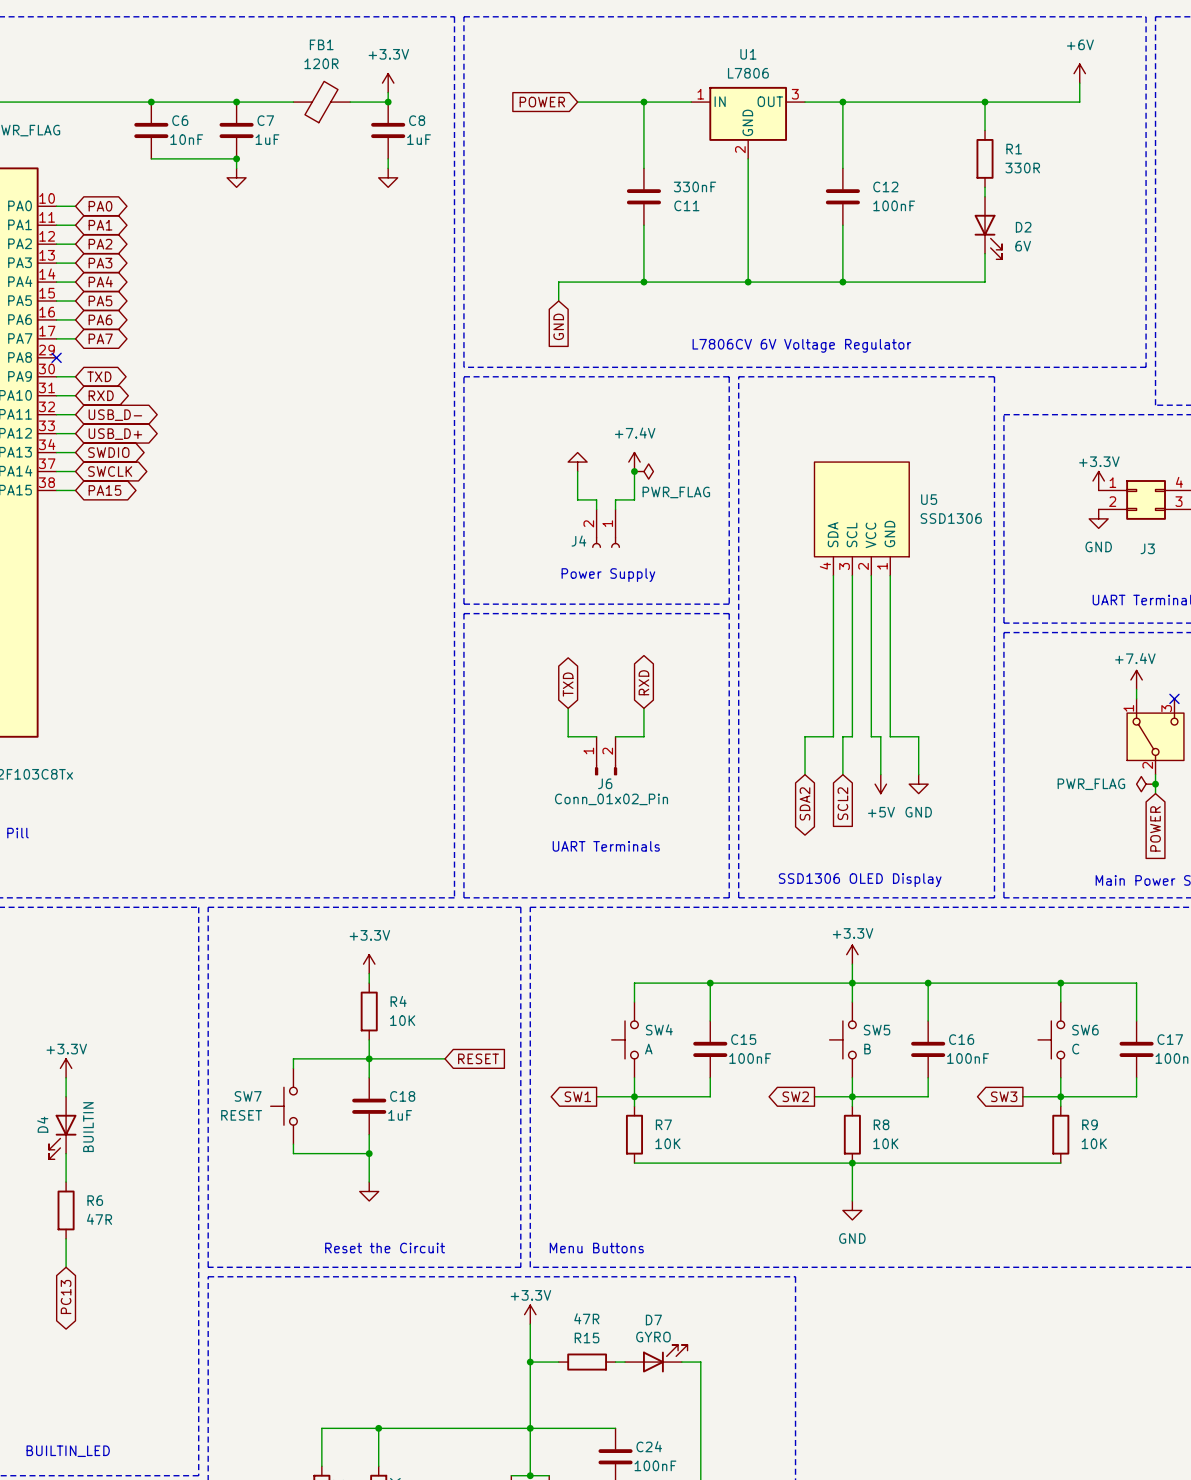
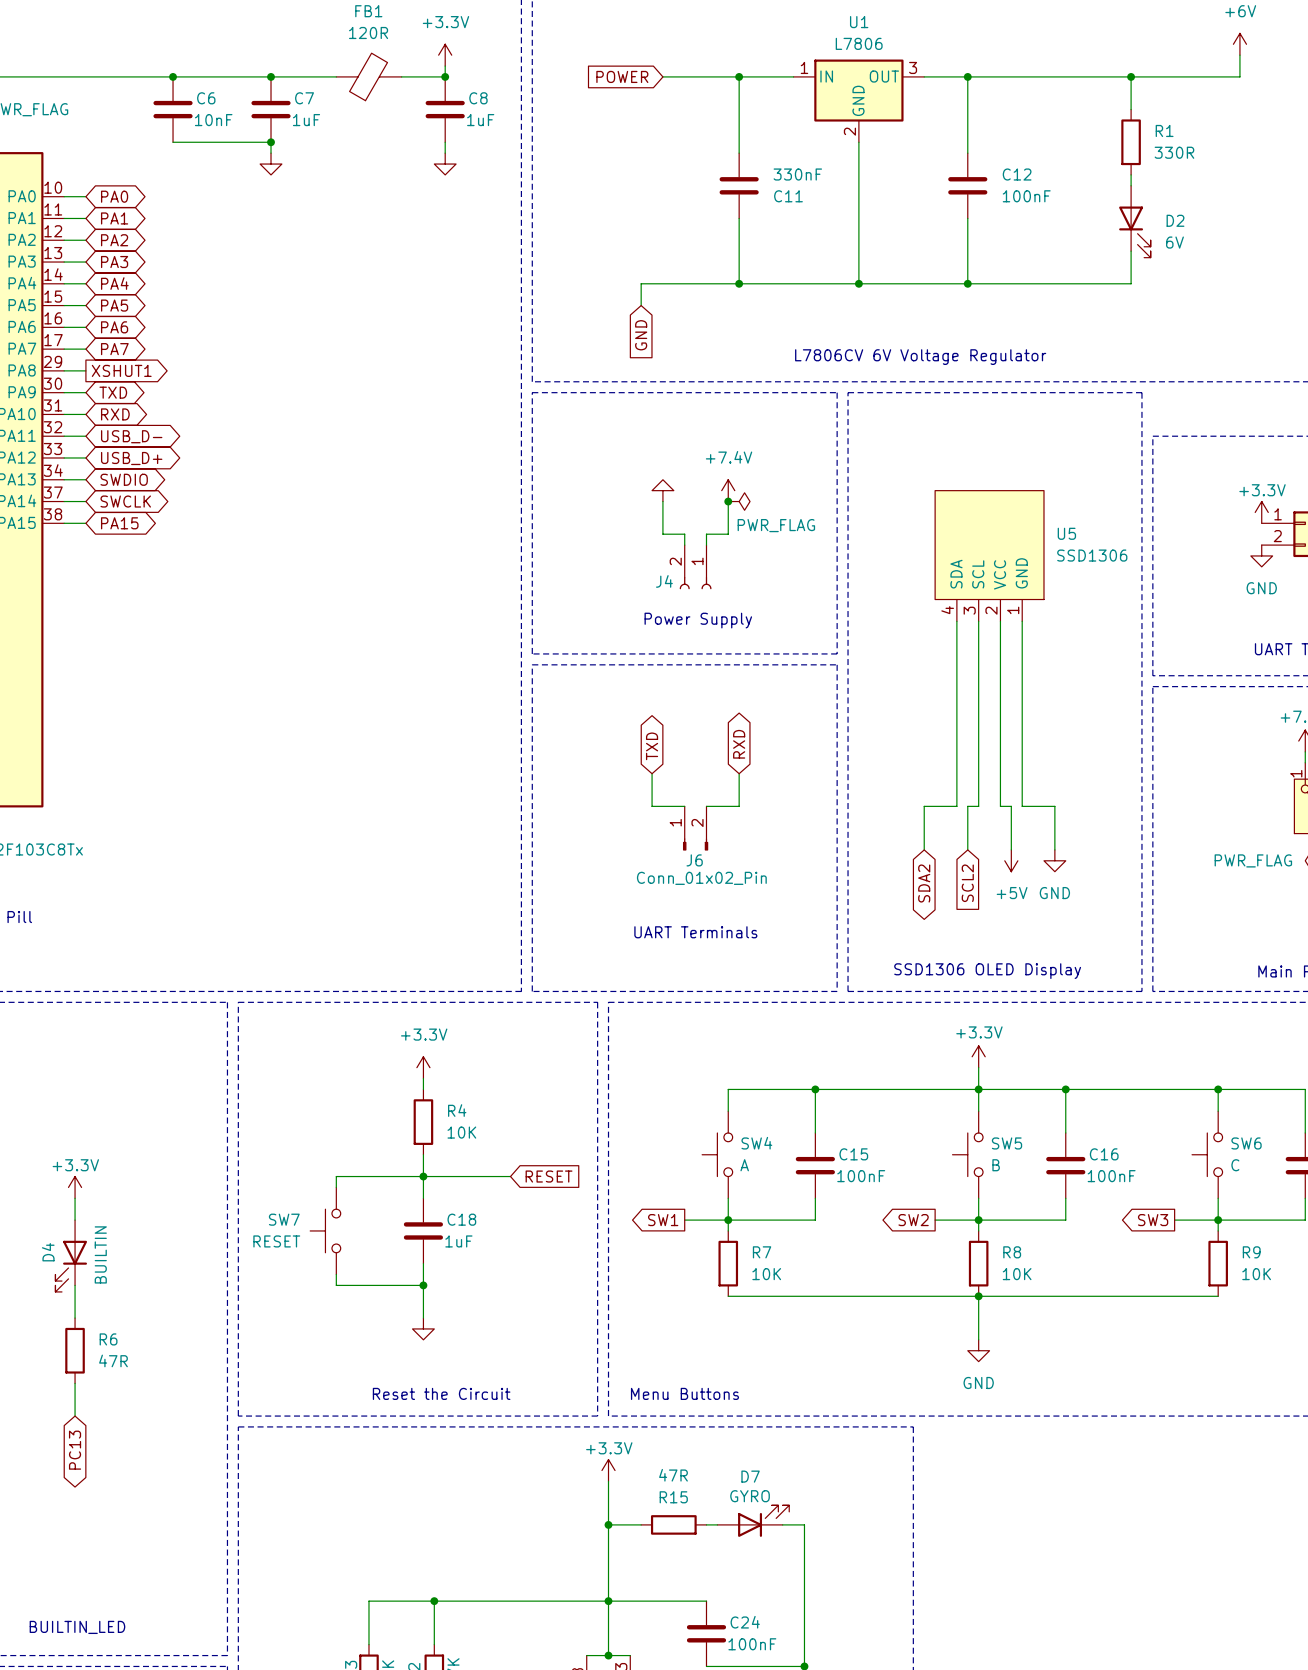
wire: none -> (64, 370) (85, 370)
no-connect mark: (56, 357) -> none
global label: none -> XSHUT1 (121, 370)

